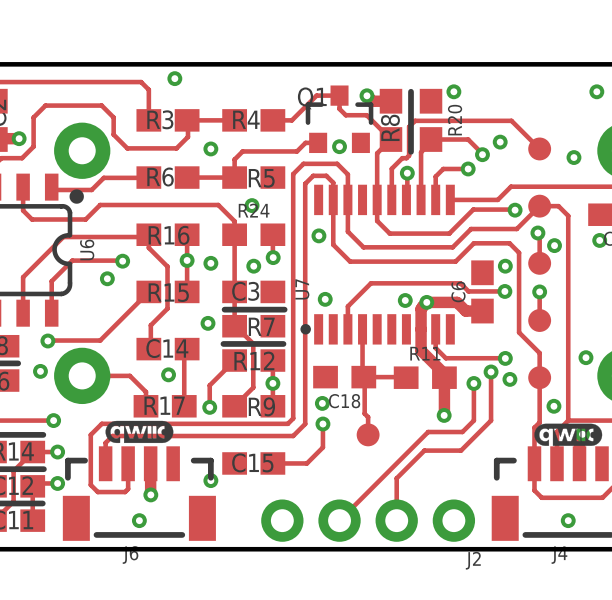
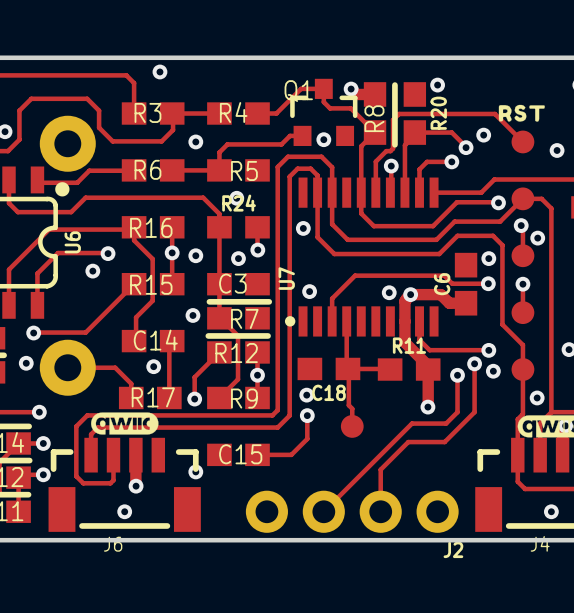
drawing: none -> [498, 104, 545, 122]

